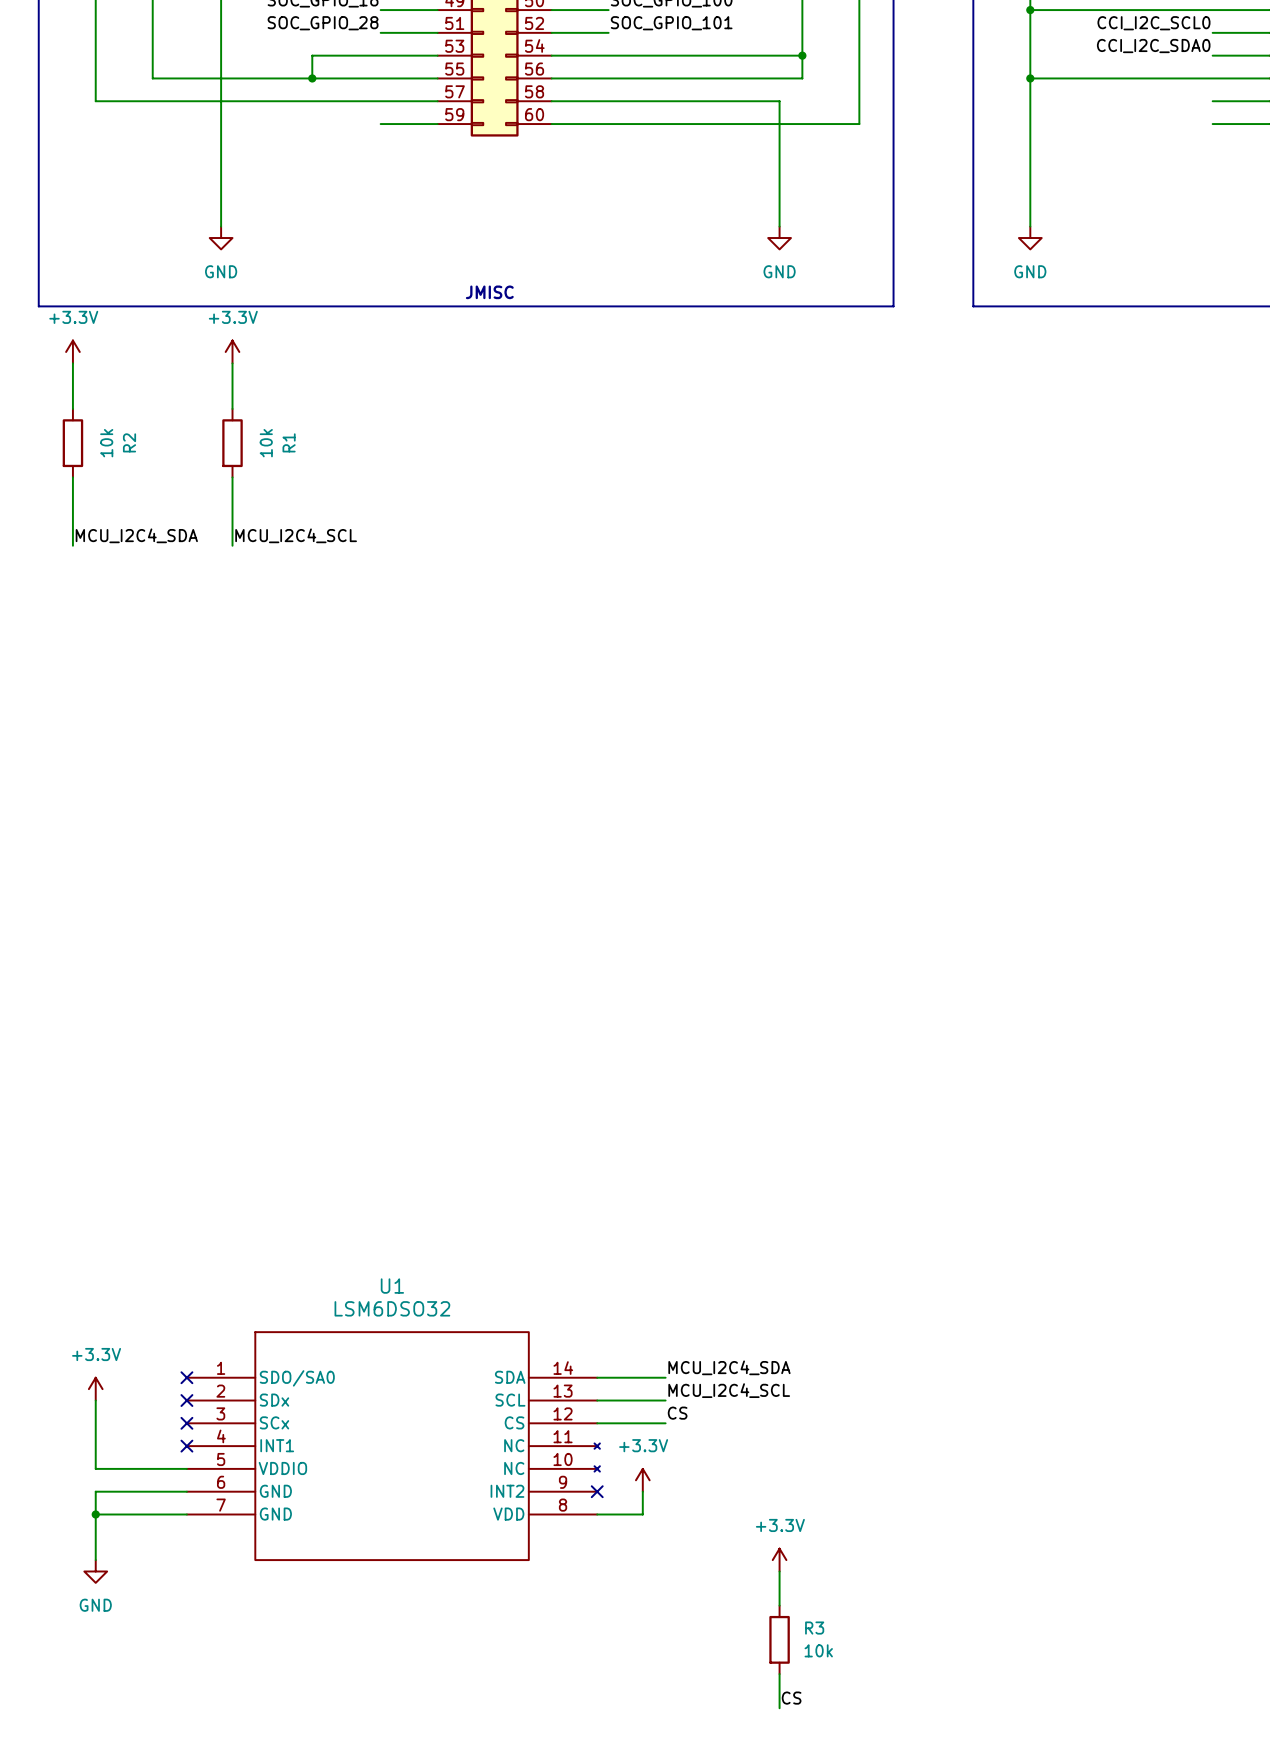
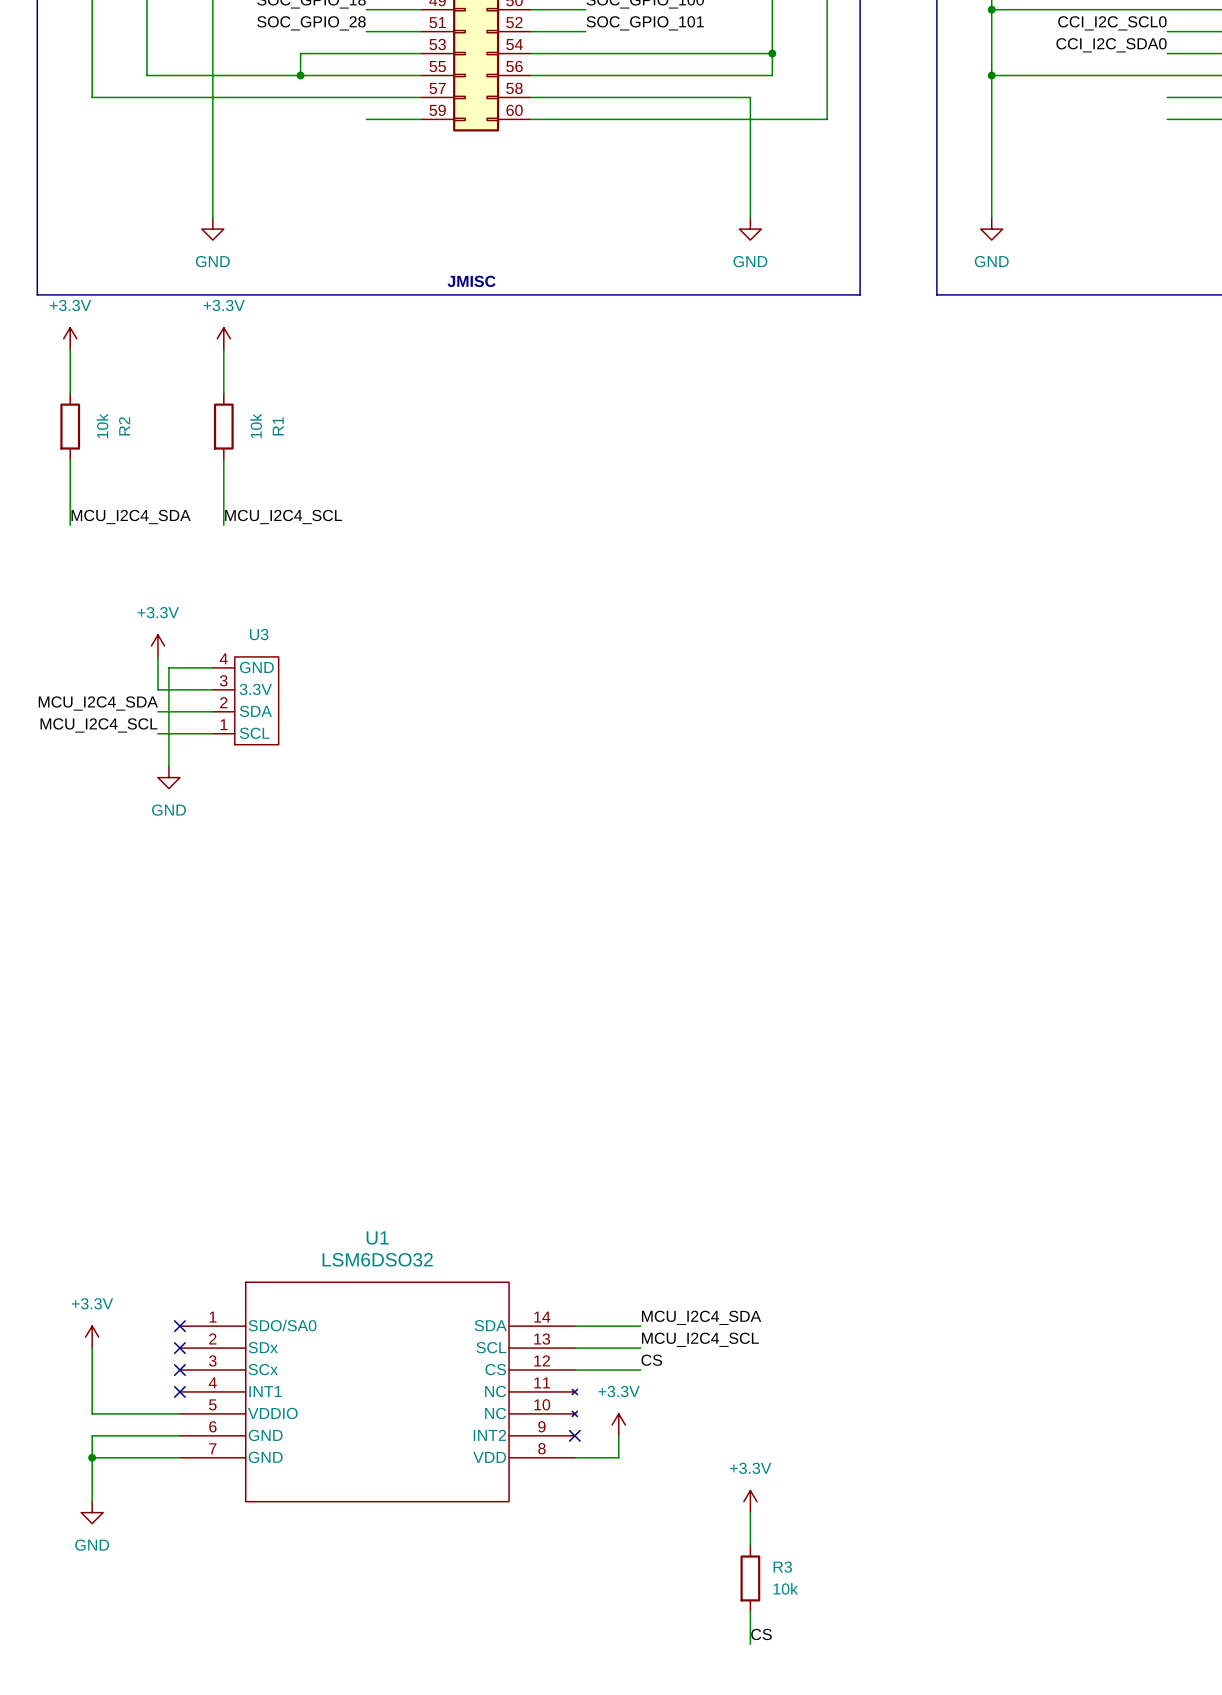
power symbol: none -> +3.3V (157, 645)
wire: none -> (157, 656) (157, 689) (212, 689)
wire: none -> (212, 667) (168, 667) (168, 766)
U3: none -> (245, 700)
label: none -> MCU_I2C4_SDA (98, 703)
wire: none -> (157, 711) (212, 711)
label: none -> MCU_I2C4_SCL (98, 725)
wire: none -> (157, 733) (212, 733)
power symbol: none -> GND (168, 777)

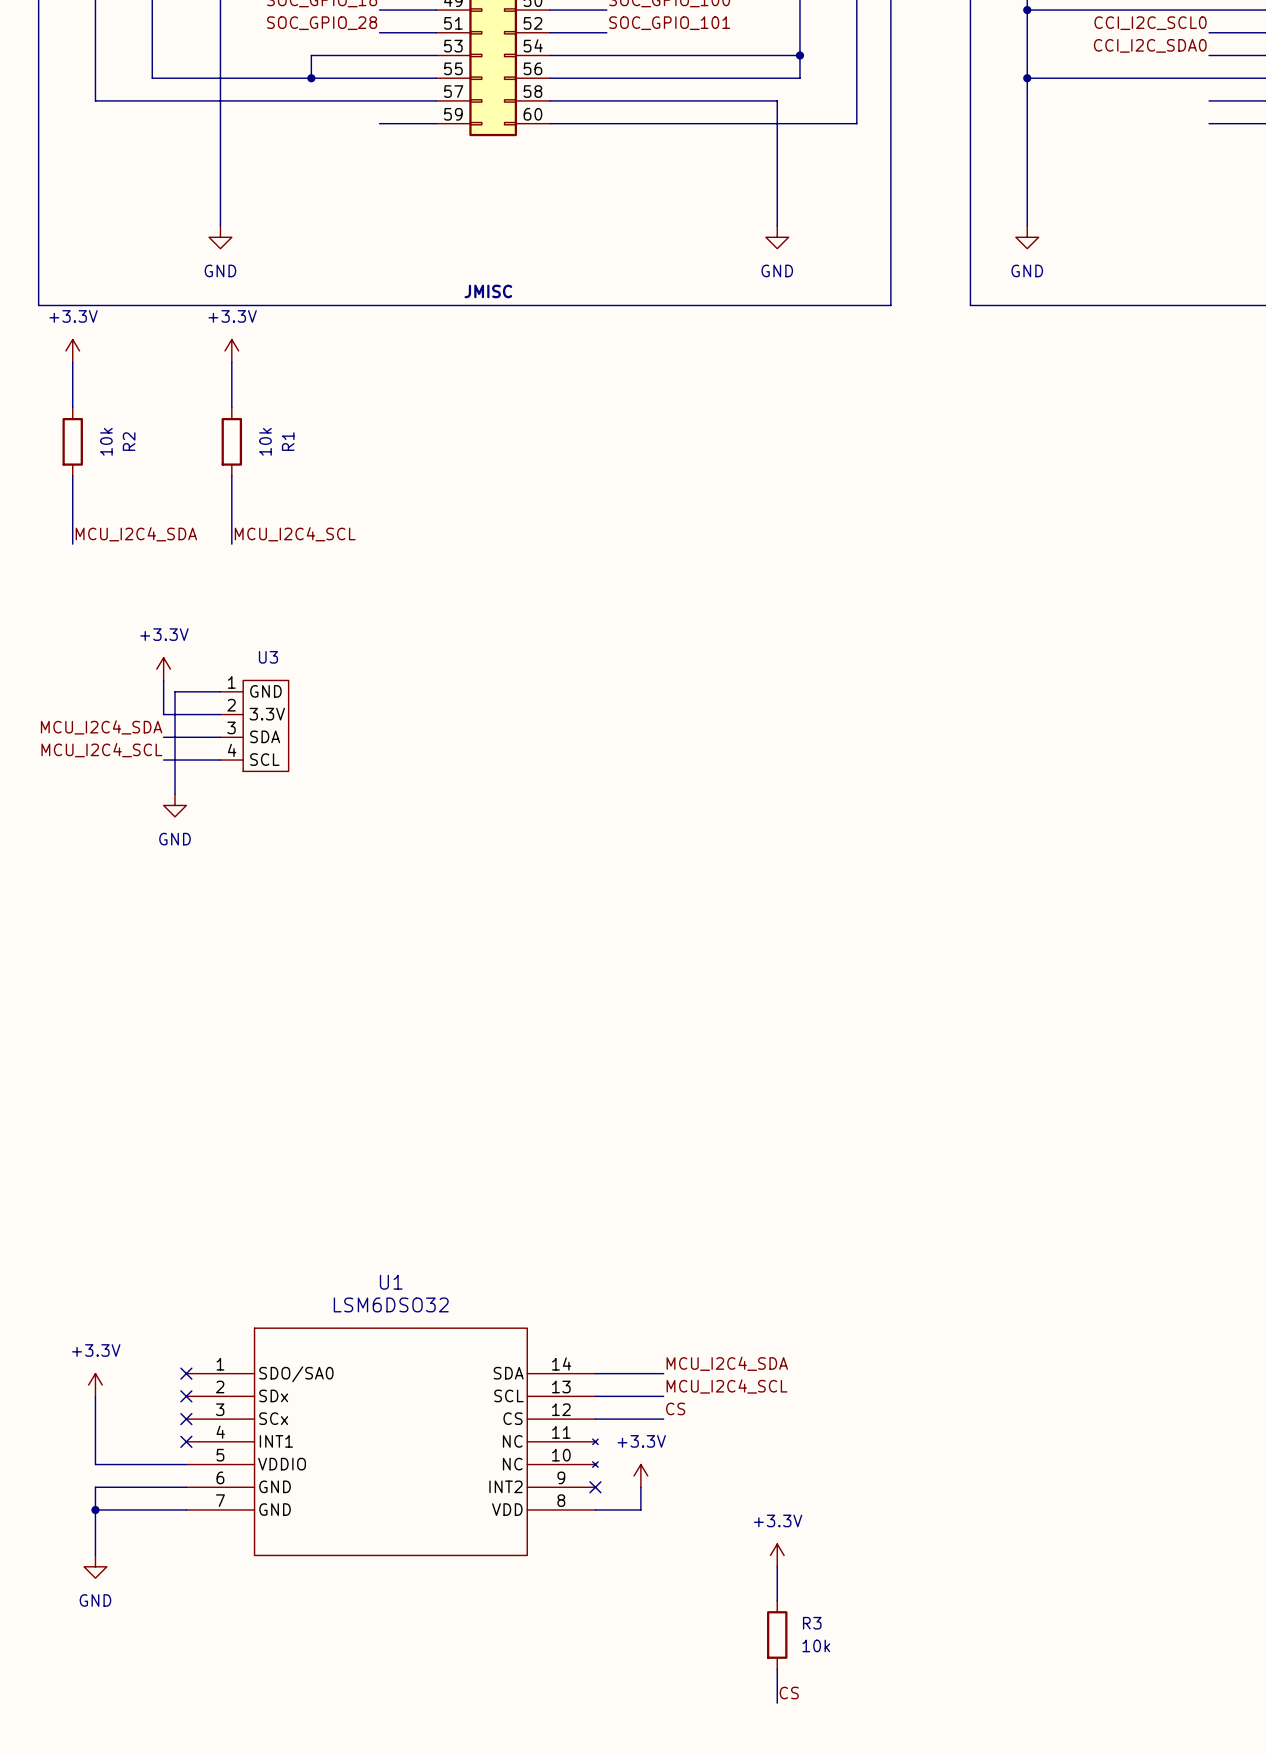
U3 pin number: 4 (223, 658) -> 1 (231, 682)
U3 pin number: 3 (223, 680) -> 2 (231, 705)
U3 pin number: 2 (223, 702) -> 3 (231, 727)
U3 pin number: 1 (224, 724) -> 4 (232, 750)

